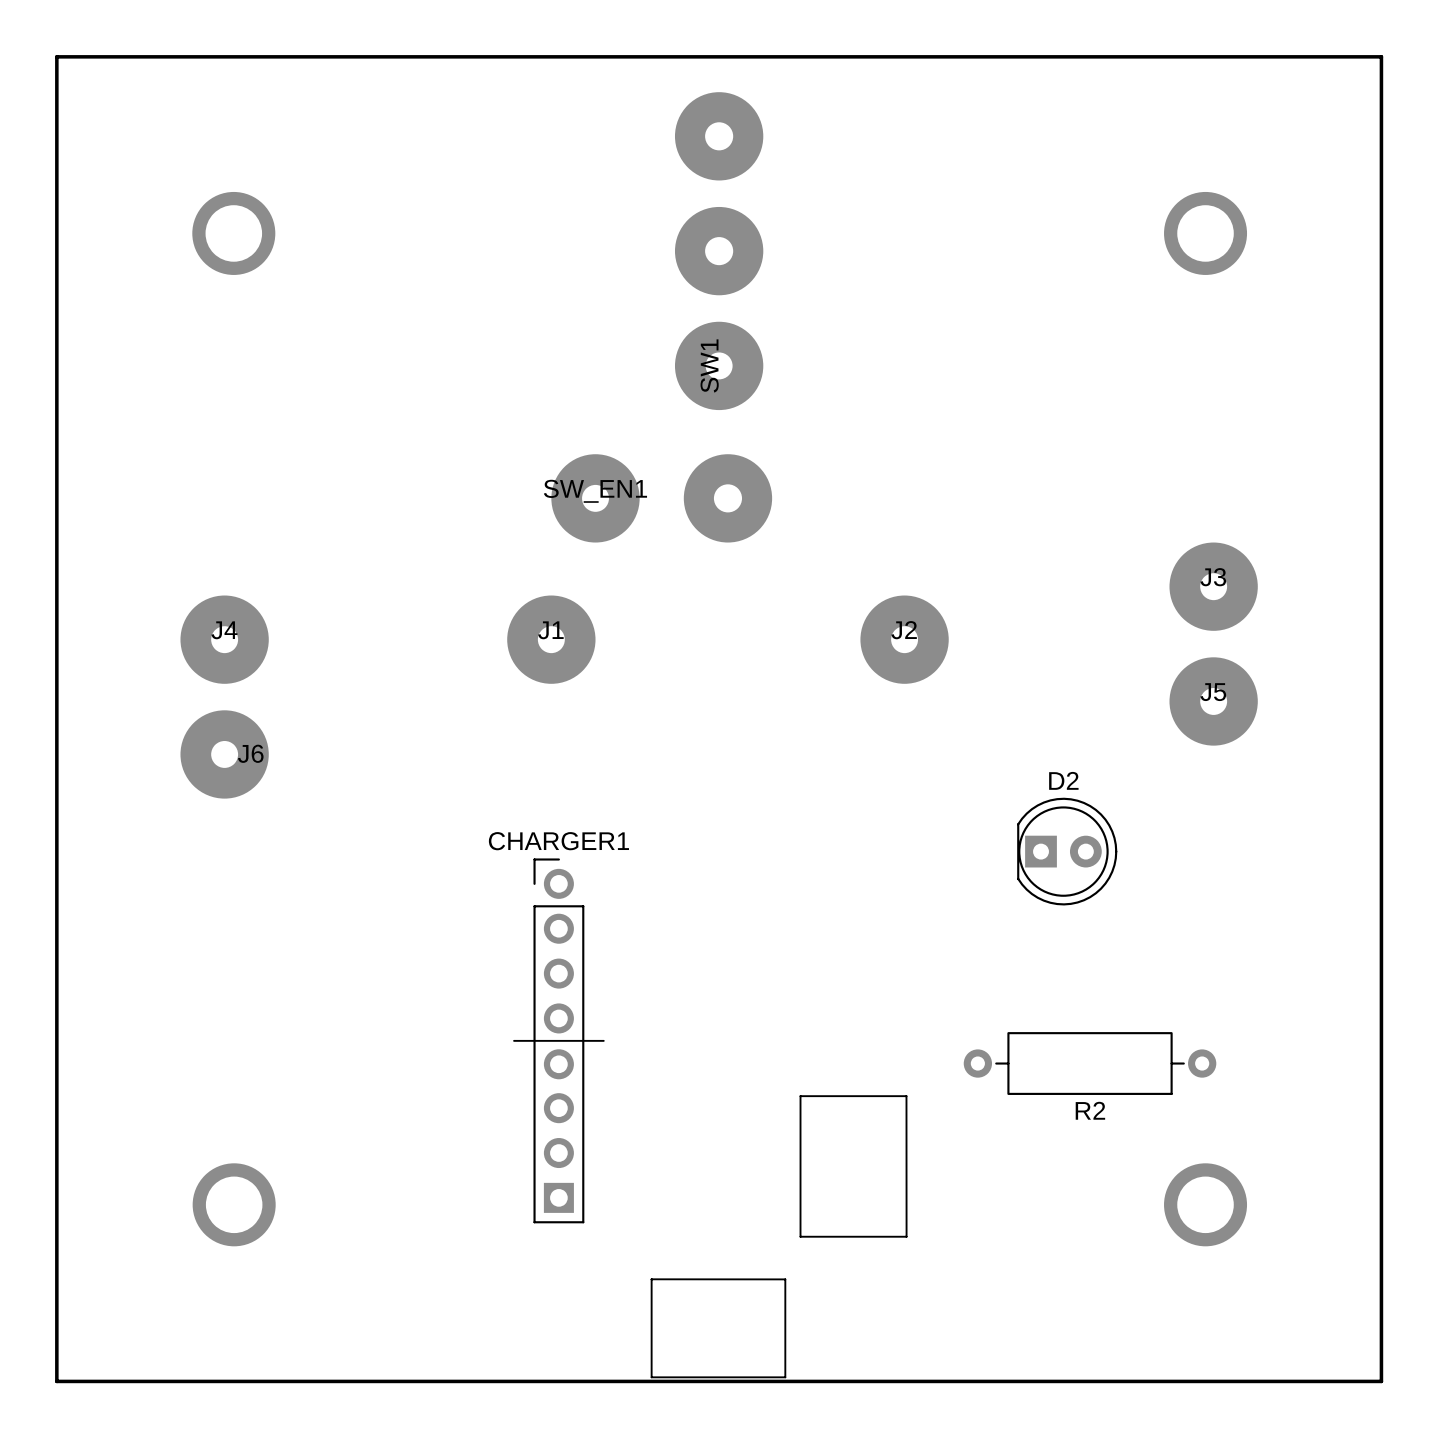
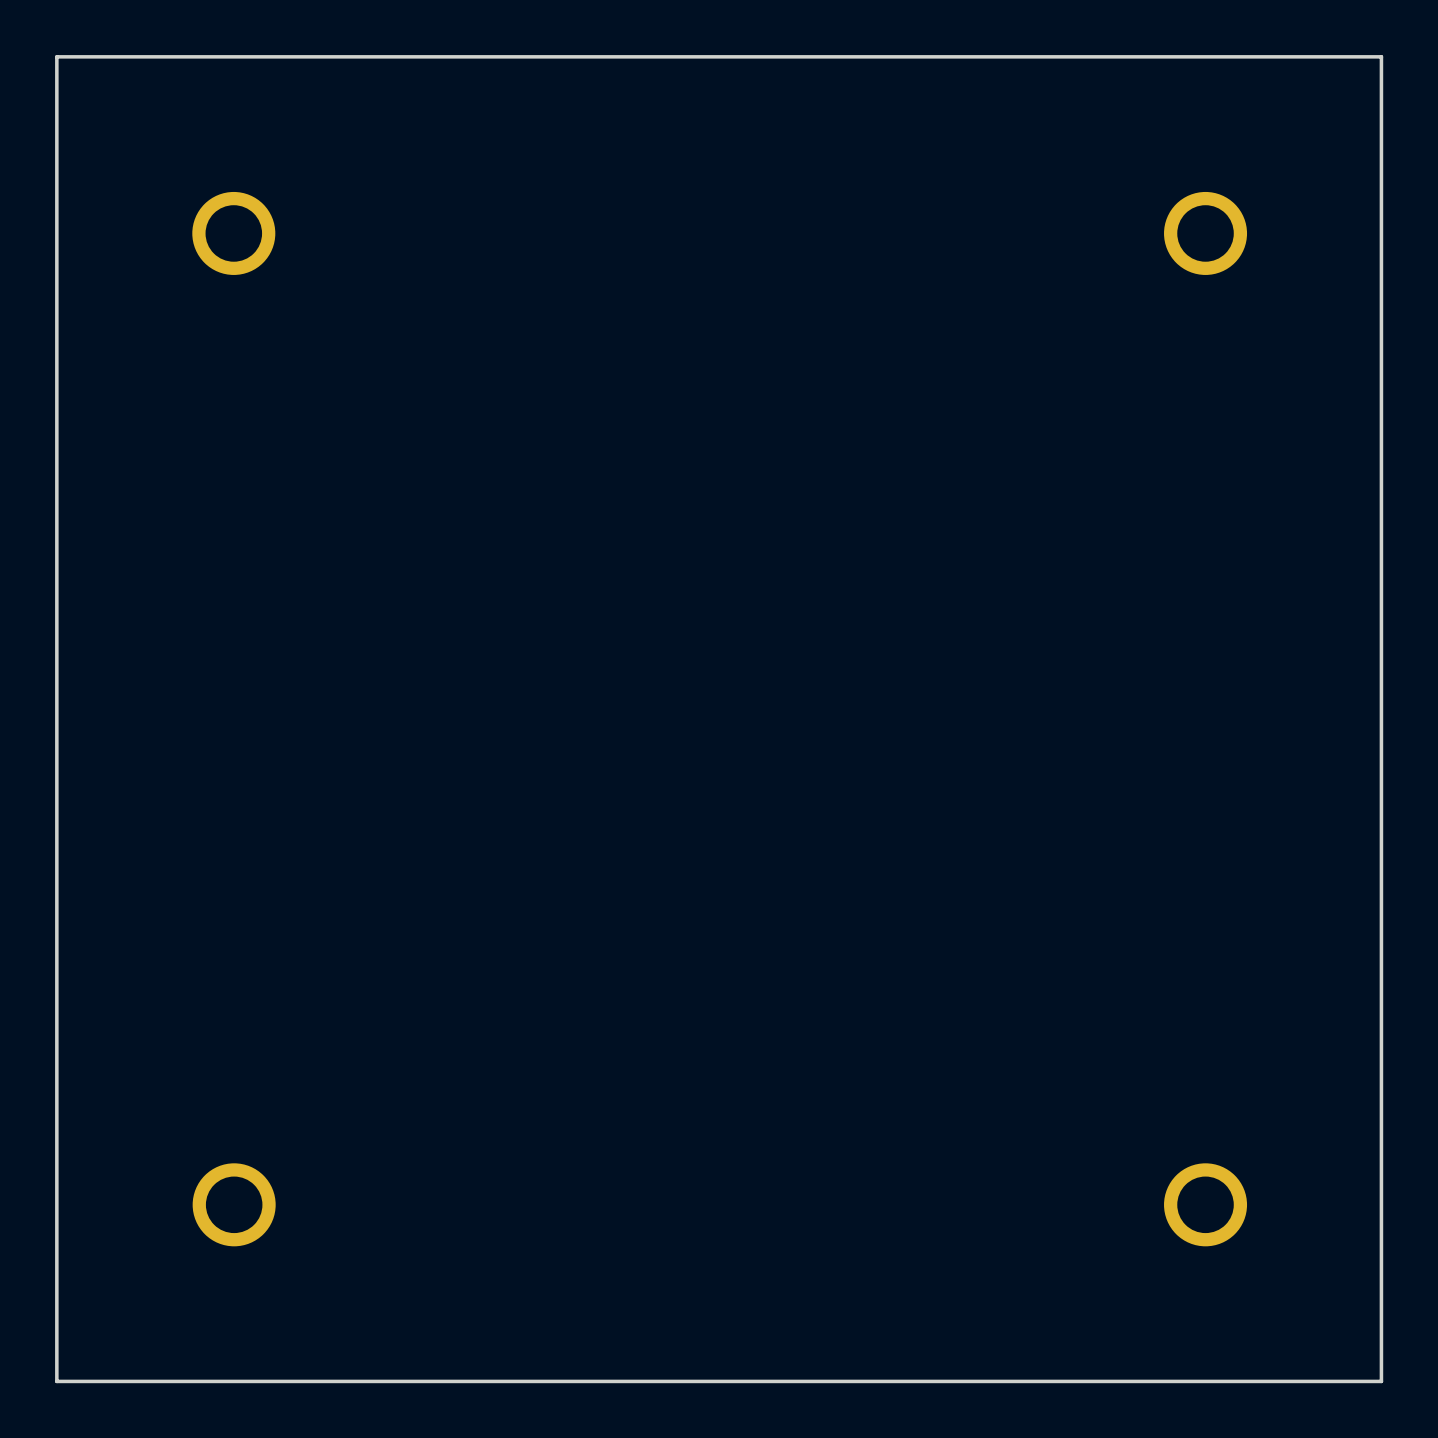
SW1: (719, 251) -> none
SW_EN1: (661, 498) -> none
J3: (1213, 586) -> none
J4: (224, 639) -> none
J1: (551, 639) -> none
J2: (904, 639) -> none
J5: (1213, 701) -> none
J6: (224, 754) -> none
D2: (1067, 851) -> none
R2: (1090, 1063) -> none
CHARGER1: (710, 1118) -> none

